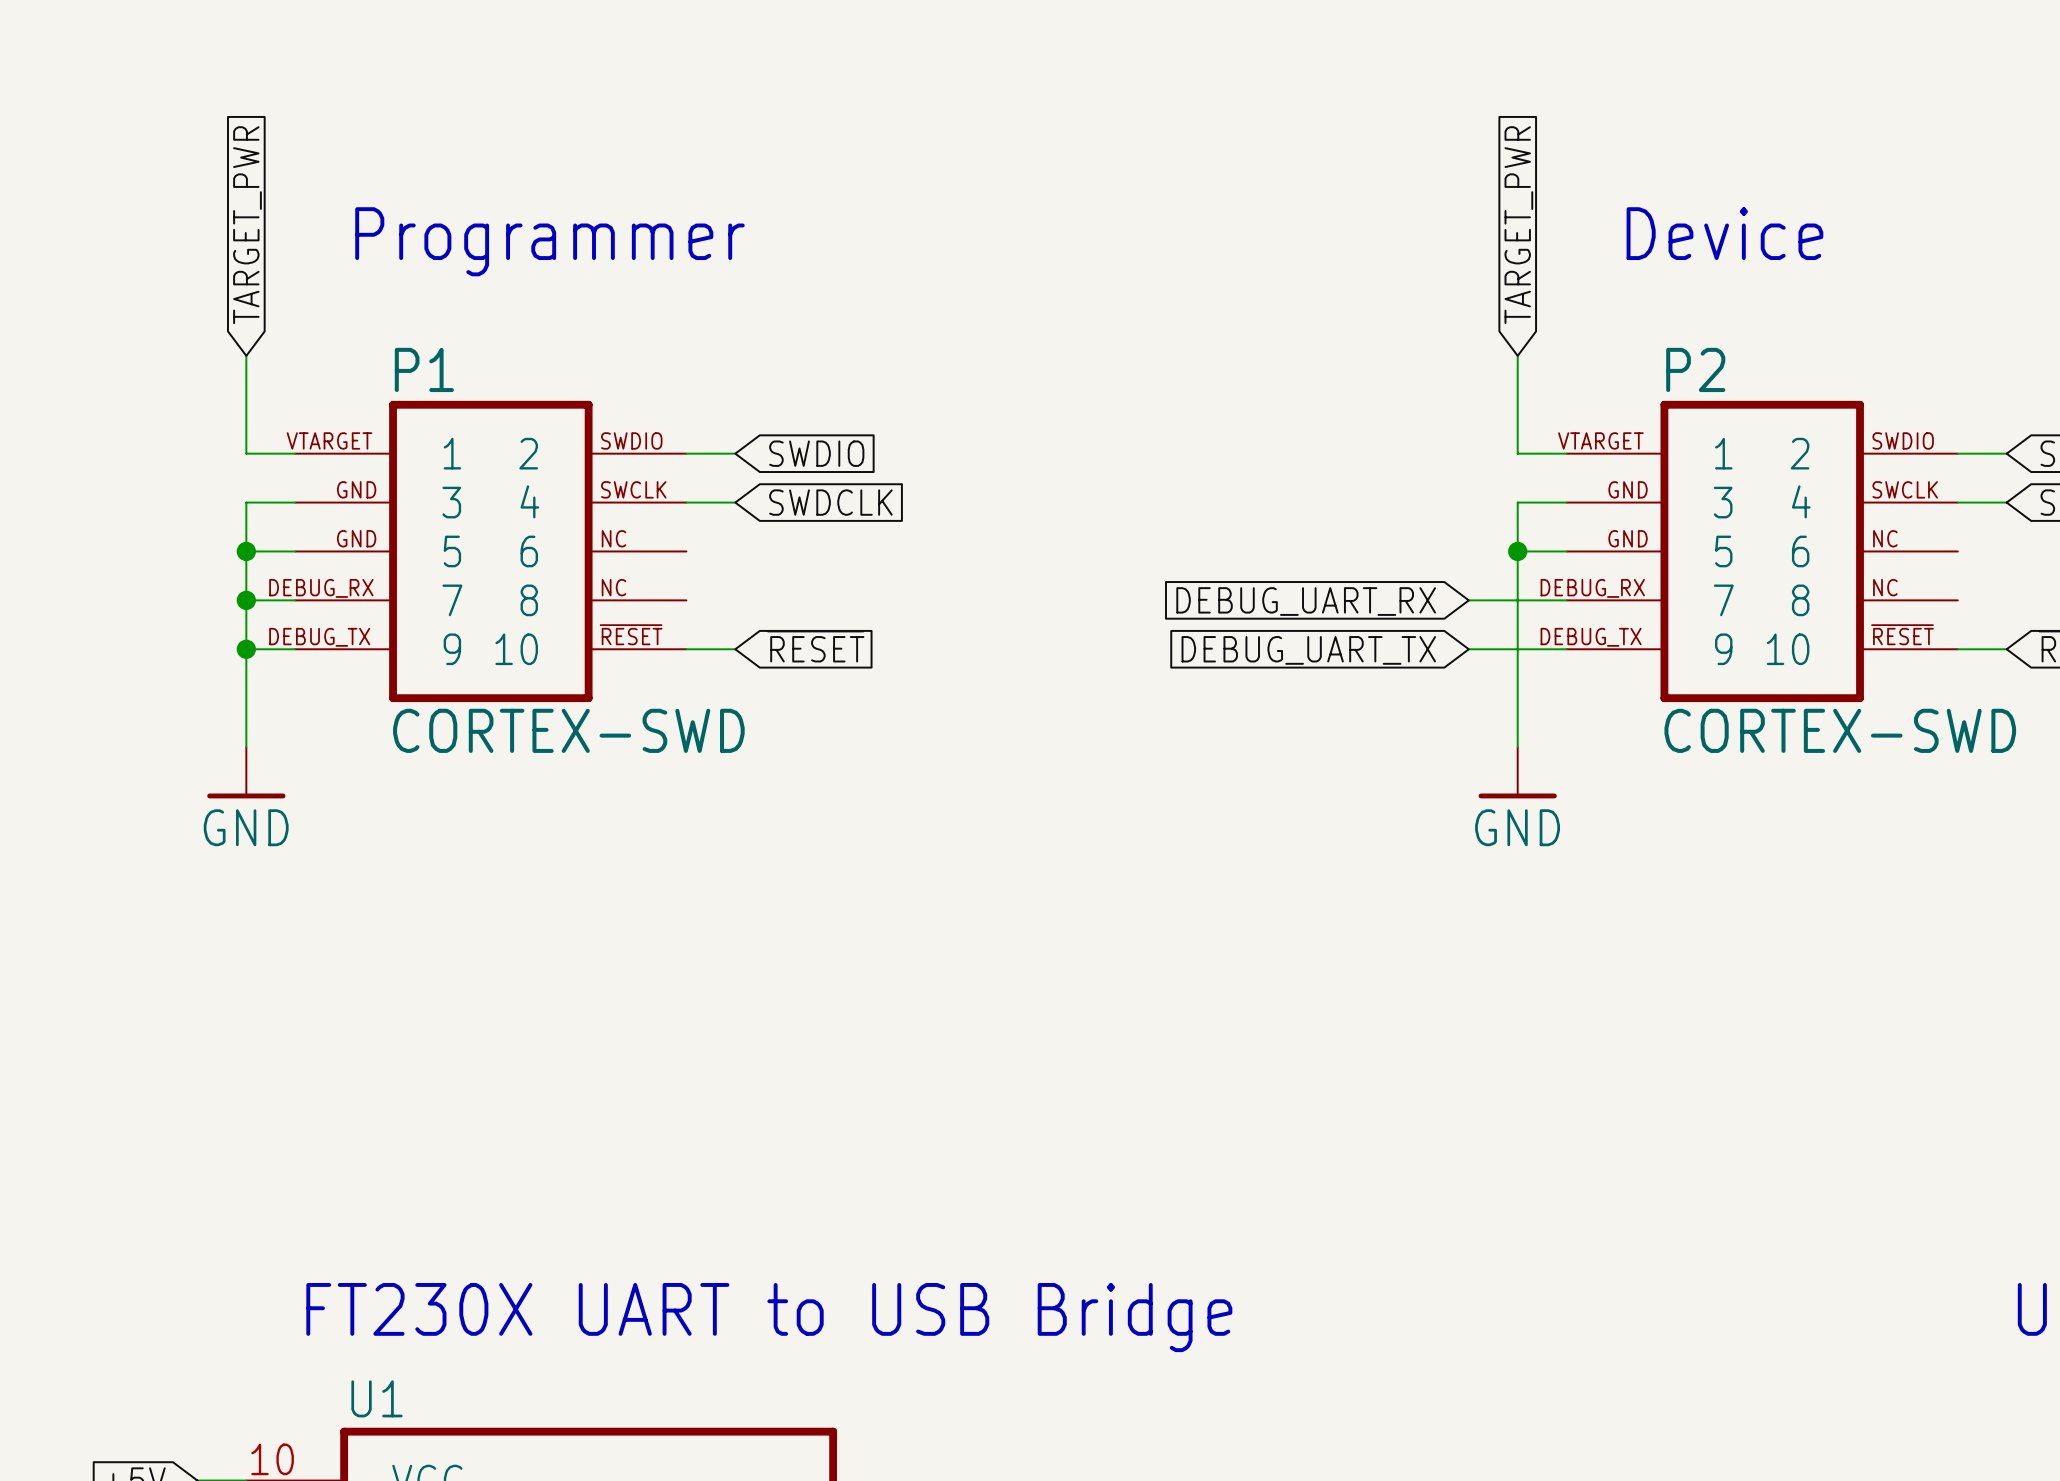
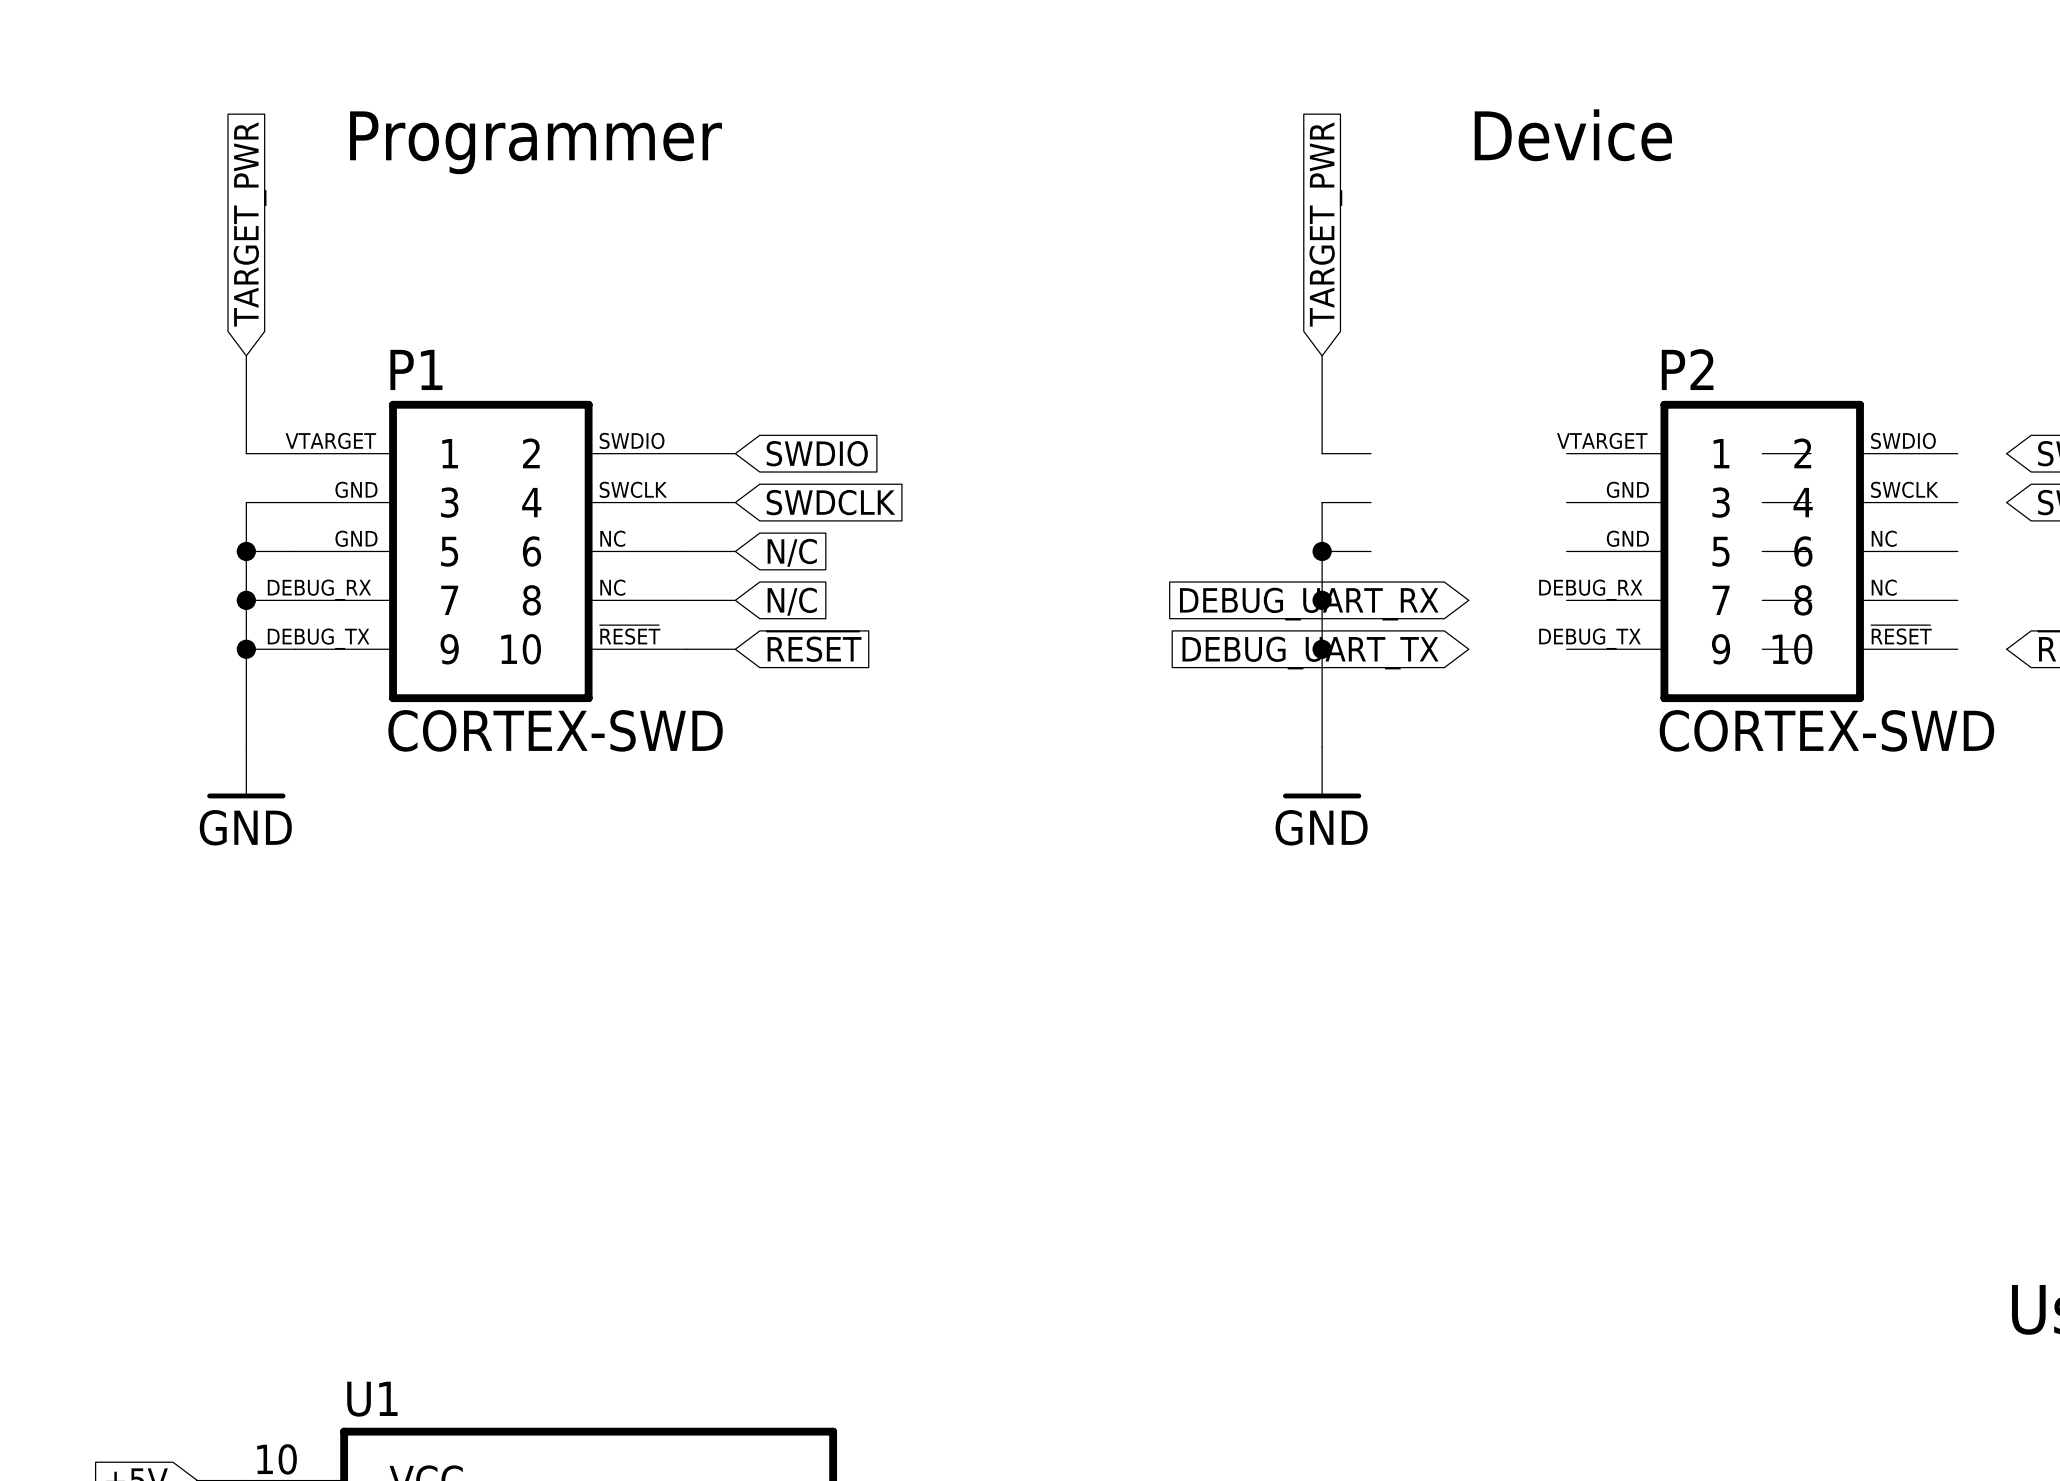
global label position: TARGET_PWR (1518, 225) -> TARGET_PWR (1325, 224)
text position: Device (1724, 233) -> Device (1573, 135)
text position: Programmer (549, 241) -> Programmer (536, 142)
wire: (1517, 355) (1517, 453) (1566, 453) -> (1322, 355) (1322, 453) (1371, 453)
wire: (1957, 453) (2006, 453) -> (1762, 453) (1811, 453)
wire: (1566, 502) (1517, 502) (1517, 747) -> (1371, 502) (1322, 502) (1322, 747)
wire: (1957, 502) (2006, 502) -> (1762, 502) (1811, 502)
wire: none -> (686, 551) (735, 551)
junction: none -> (1322, 551)
wire: (1517, 551) (1566, 551) -> (1322, 551) (1371, 551)
junction: (1517, 551) -> none
wire: none -> (1762, 551) (1811, 551)
global label: none -> N/C (792, 552)
wire: none -> (686, 600) (735, 600)
junction: none -> (1322, 600)
wire: (1468, 600) (1566, 600) -> none
wire: none -> (1762, 600) (1811, 600)
global label: none -> N/C (792, 601)
junction: none -> (1322, 649)
wire: (1468, 649) (1566, 649) -> none
wire: (1957, 649) (2006, 649) -> (1762, 649) (1811, 649)
power symbol position: GND (1517, 772) -> GND (1322, 772)
text: FT230X UART to USB Bridge (769, 1317) -> none

